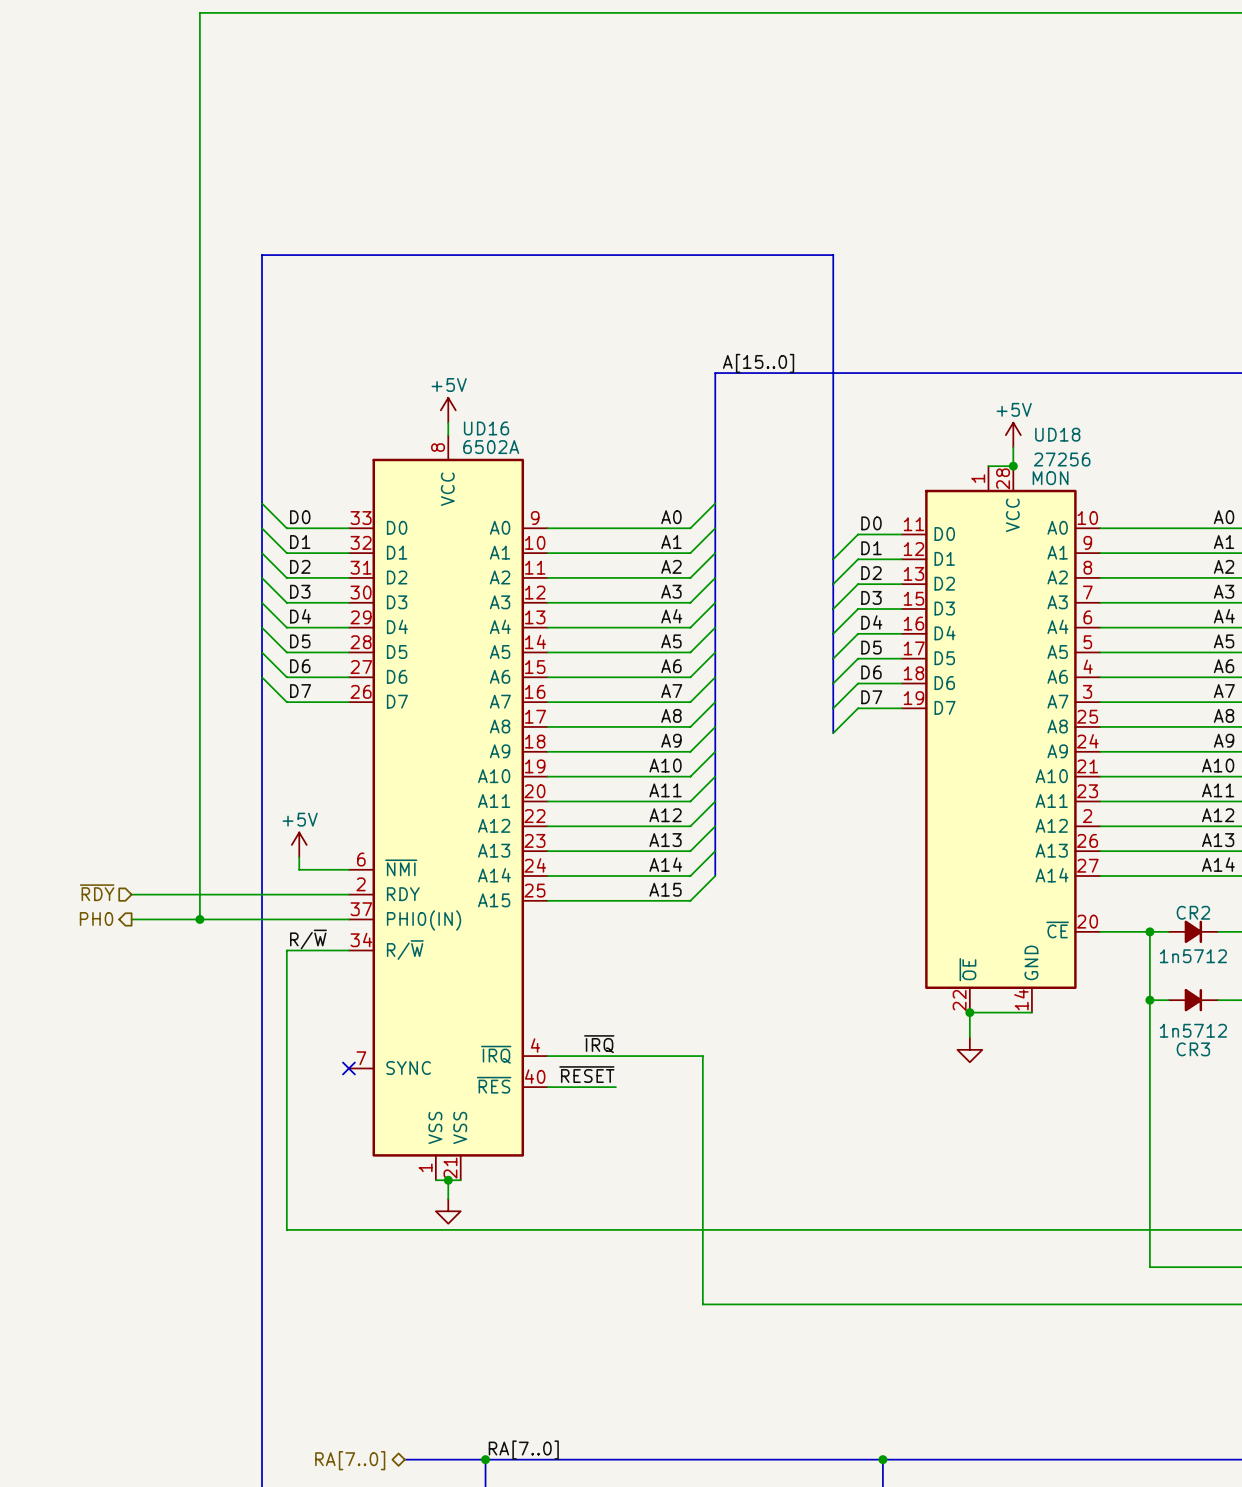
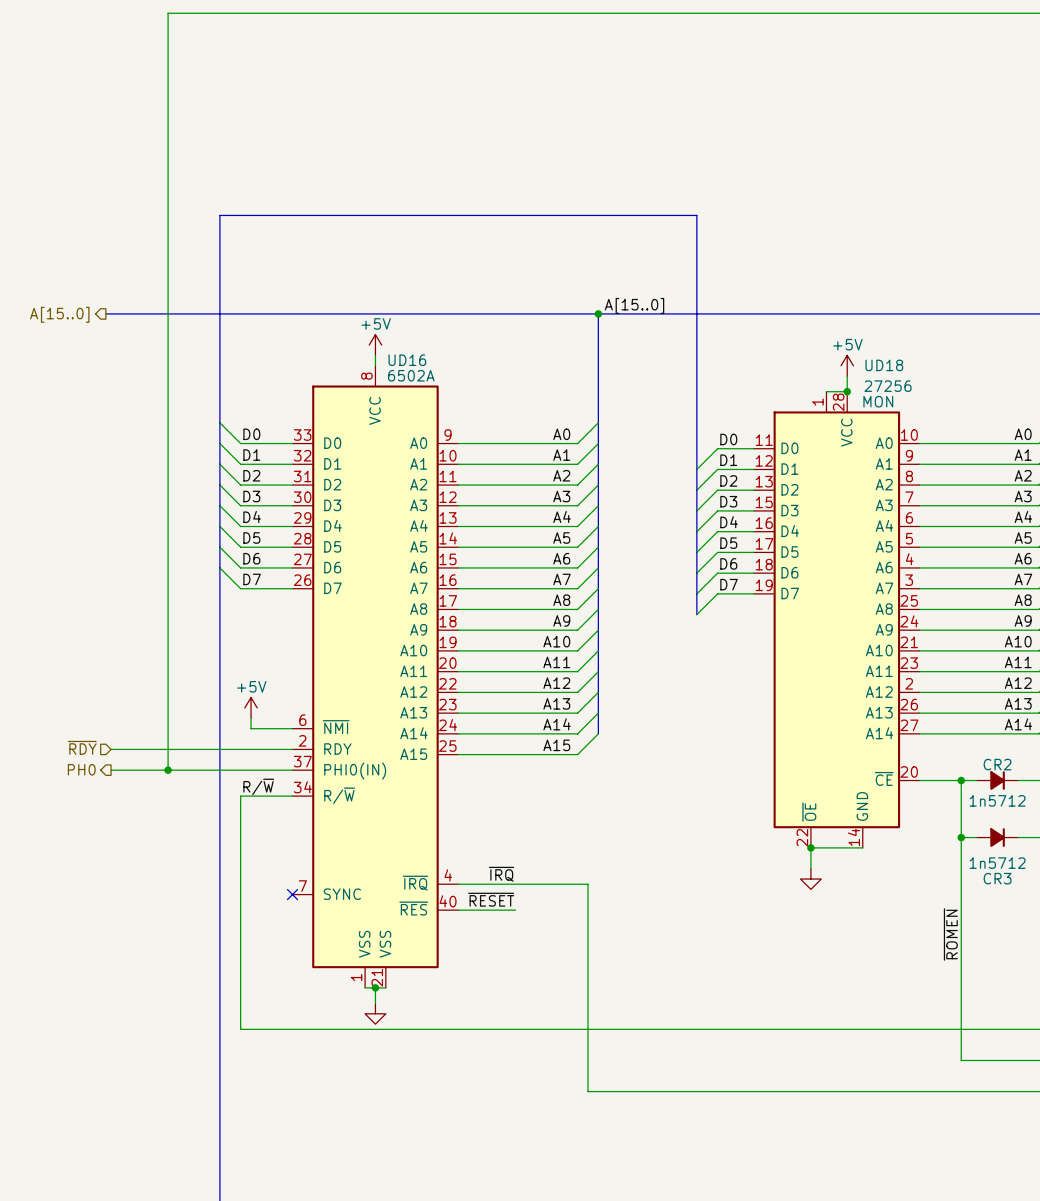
bus: none -> (105, 313) (598, 313)
junction: none -> (598, 313)
hierarchical label: none -> A[15..0] (59, 314)
label: none -> ~{ROMEN} (950, 934)

